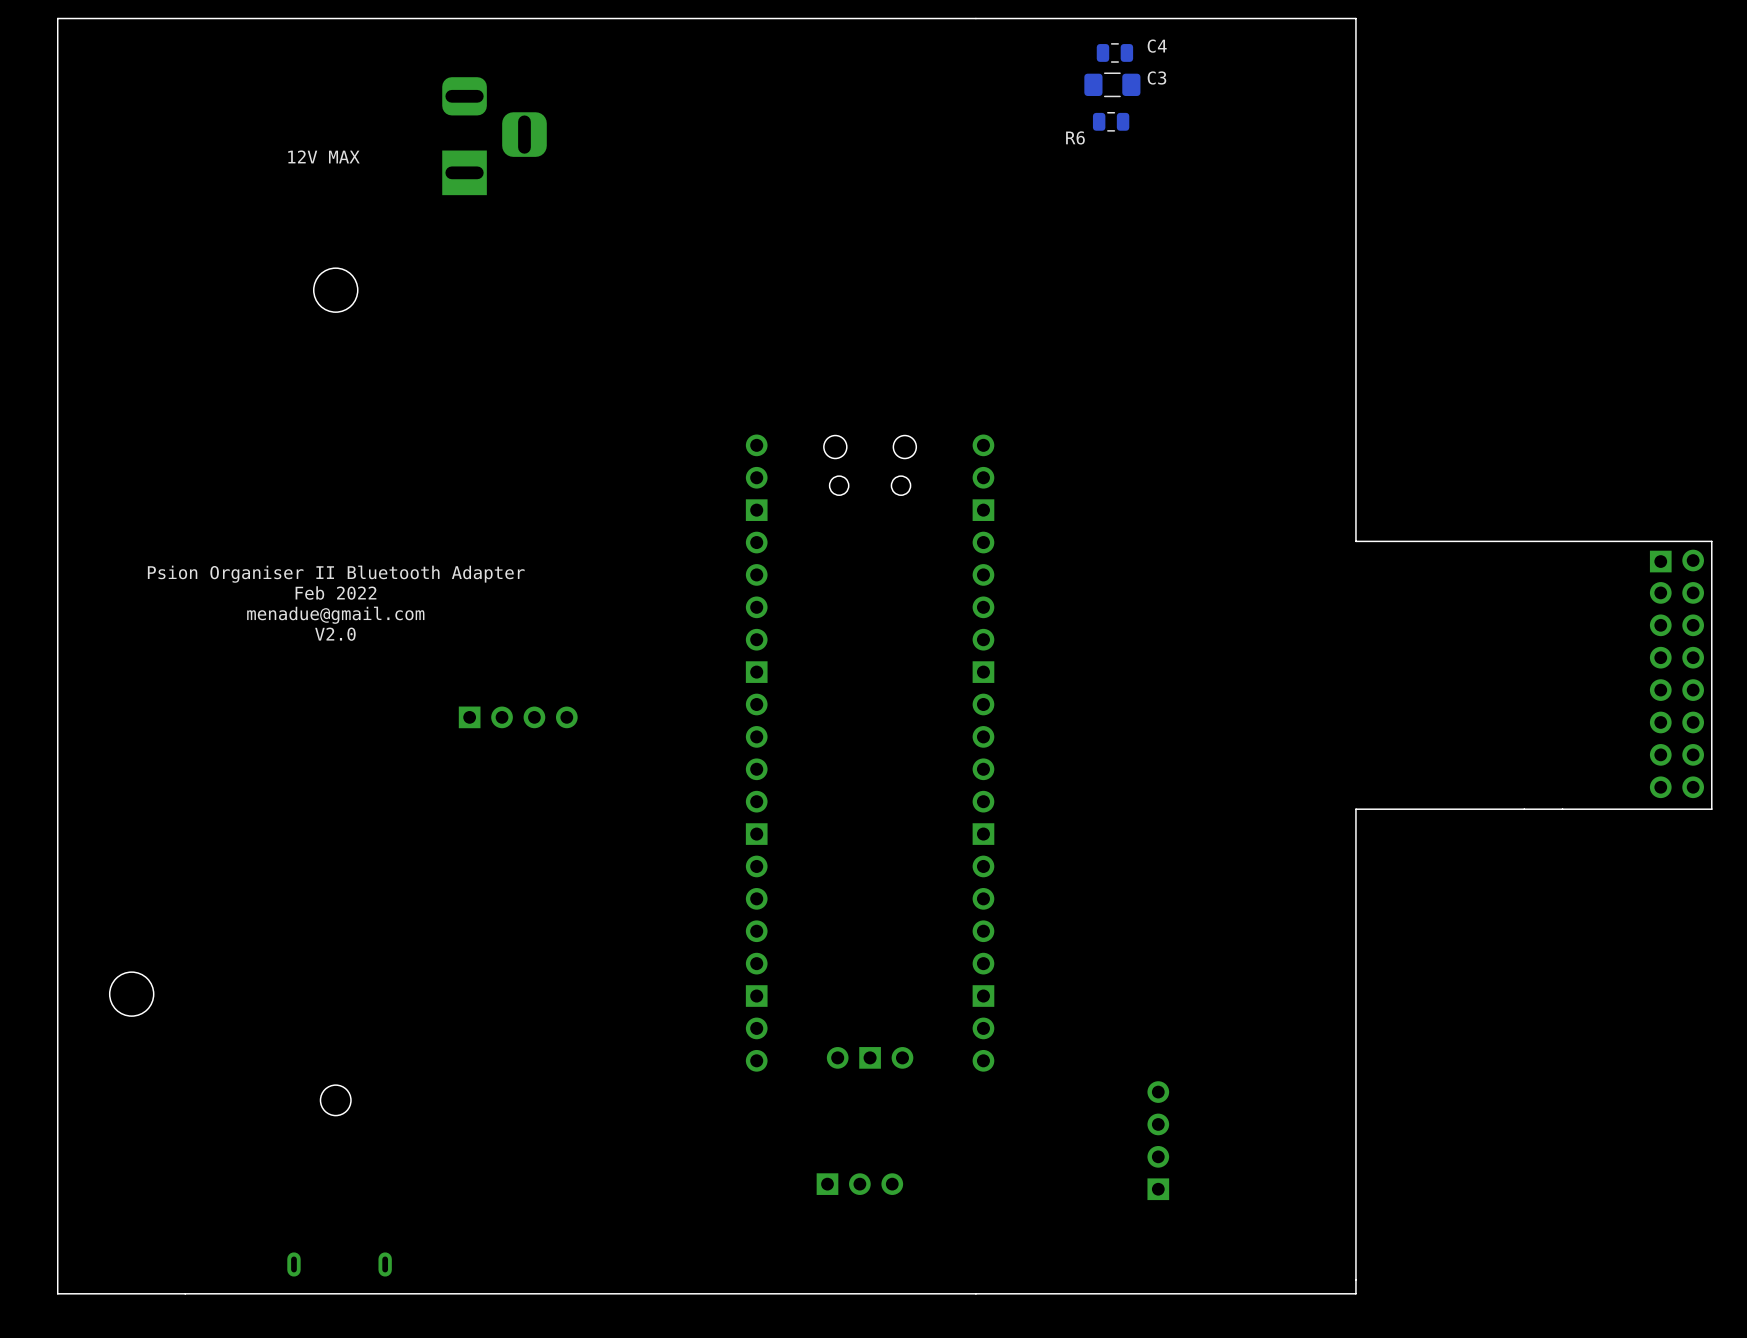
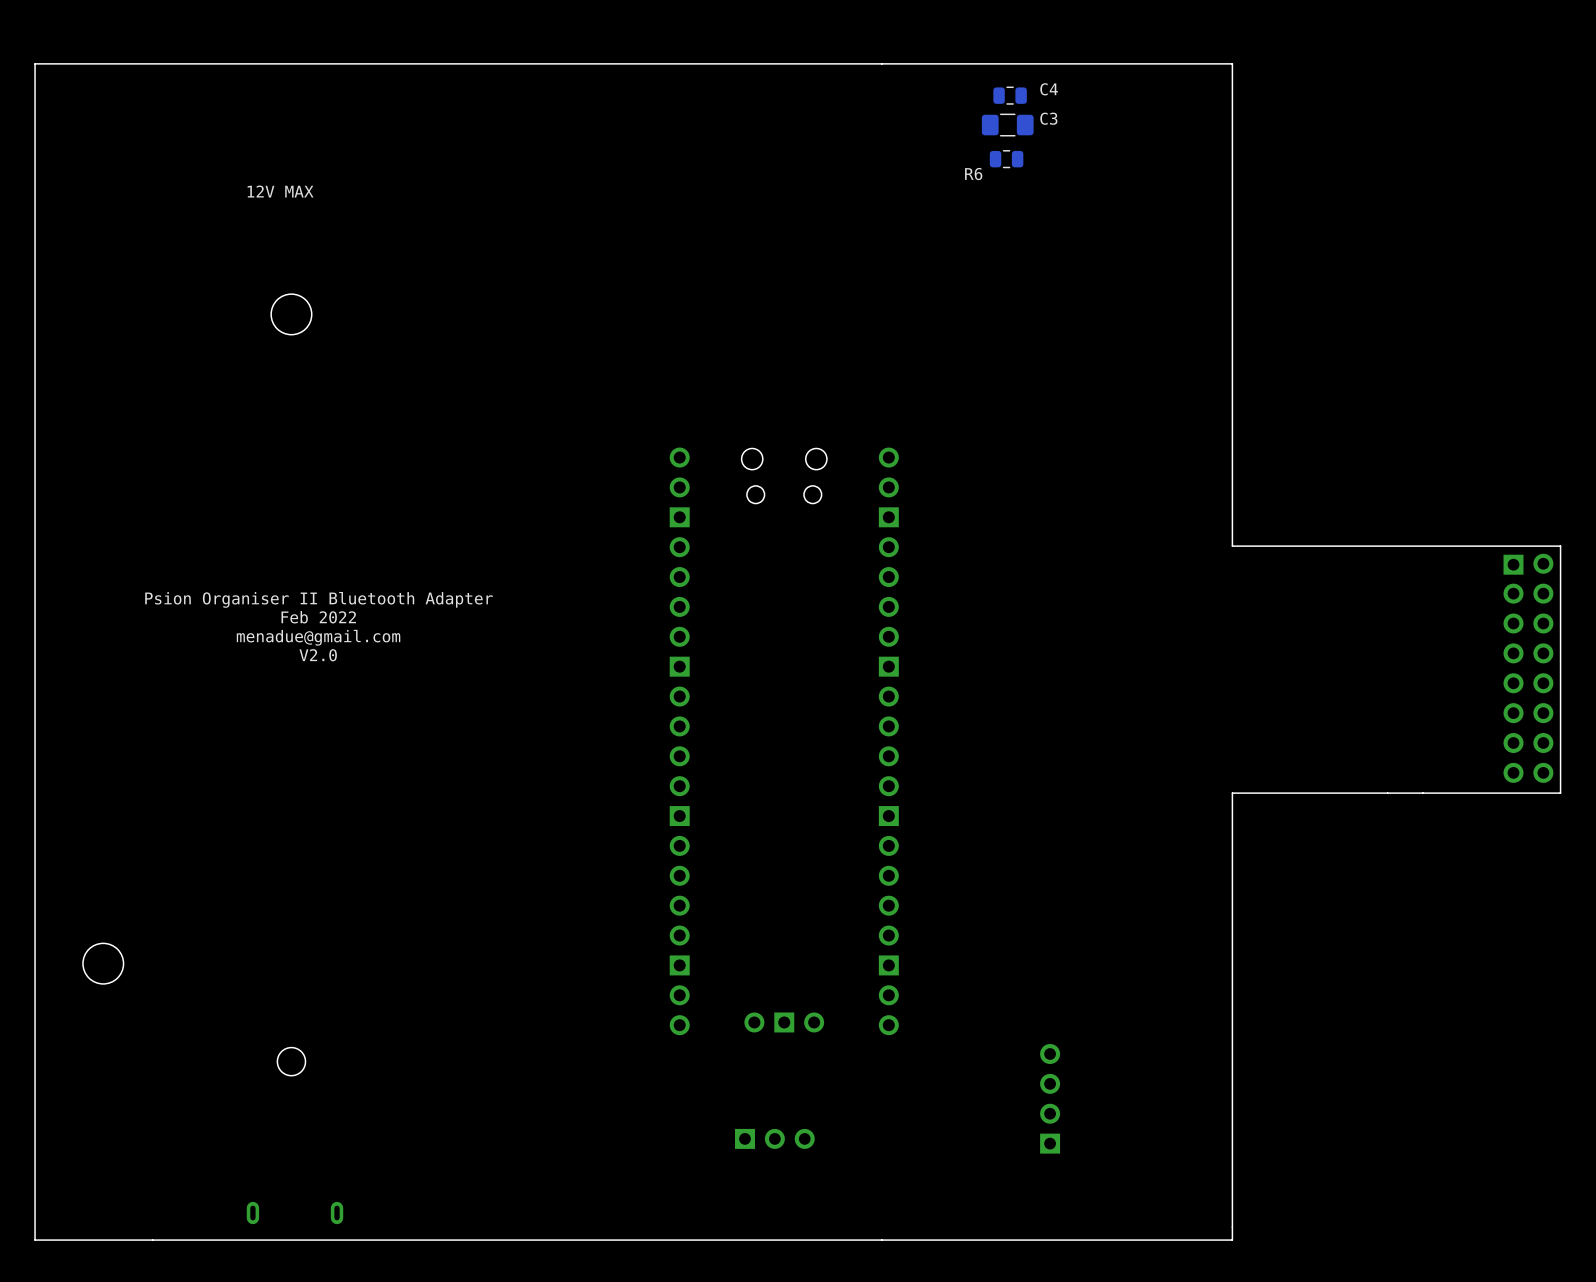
part: (494, 136) -> none
text position: Psion Organiser II Bluetooth Adapter (336, 574) -> Psion Organiser II Bluetooth Adapter (318, 599)
text position: Feb 2022 (335, 592) -> Feb 2022 (318, 617)
text position: menadue@gmail.com (335, 615) -> menadue@gmail.com (318, 637)
text position: V2.0 (335, 634) -> V2.0 (318, 655)
part: (518, 717) -> none

